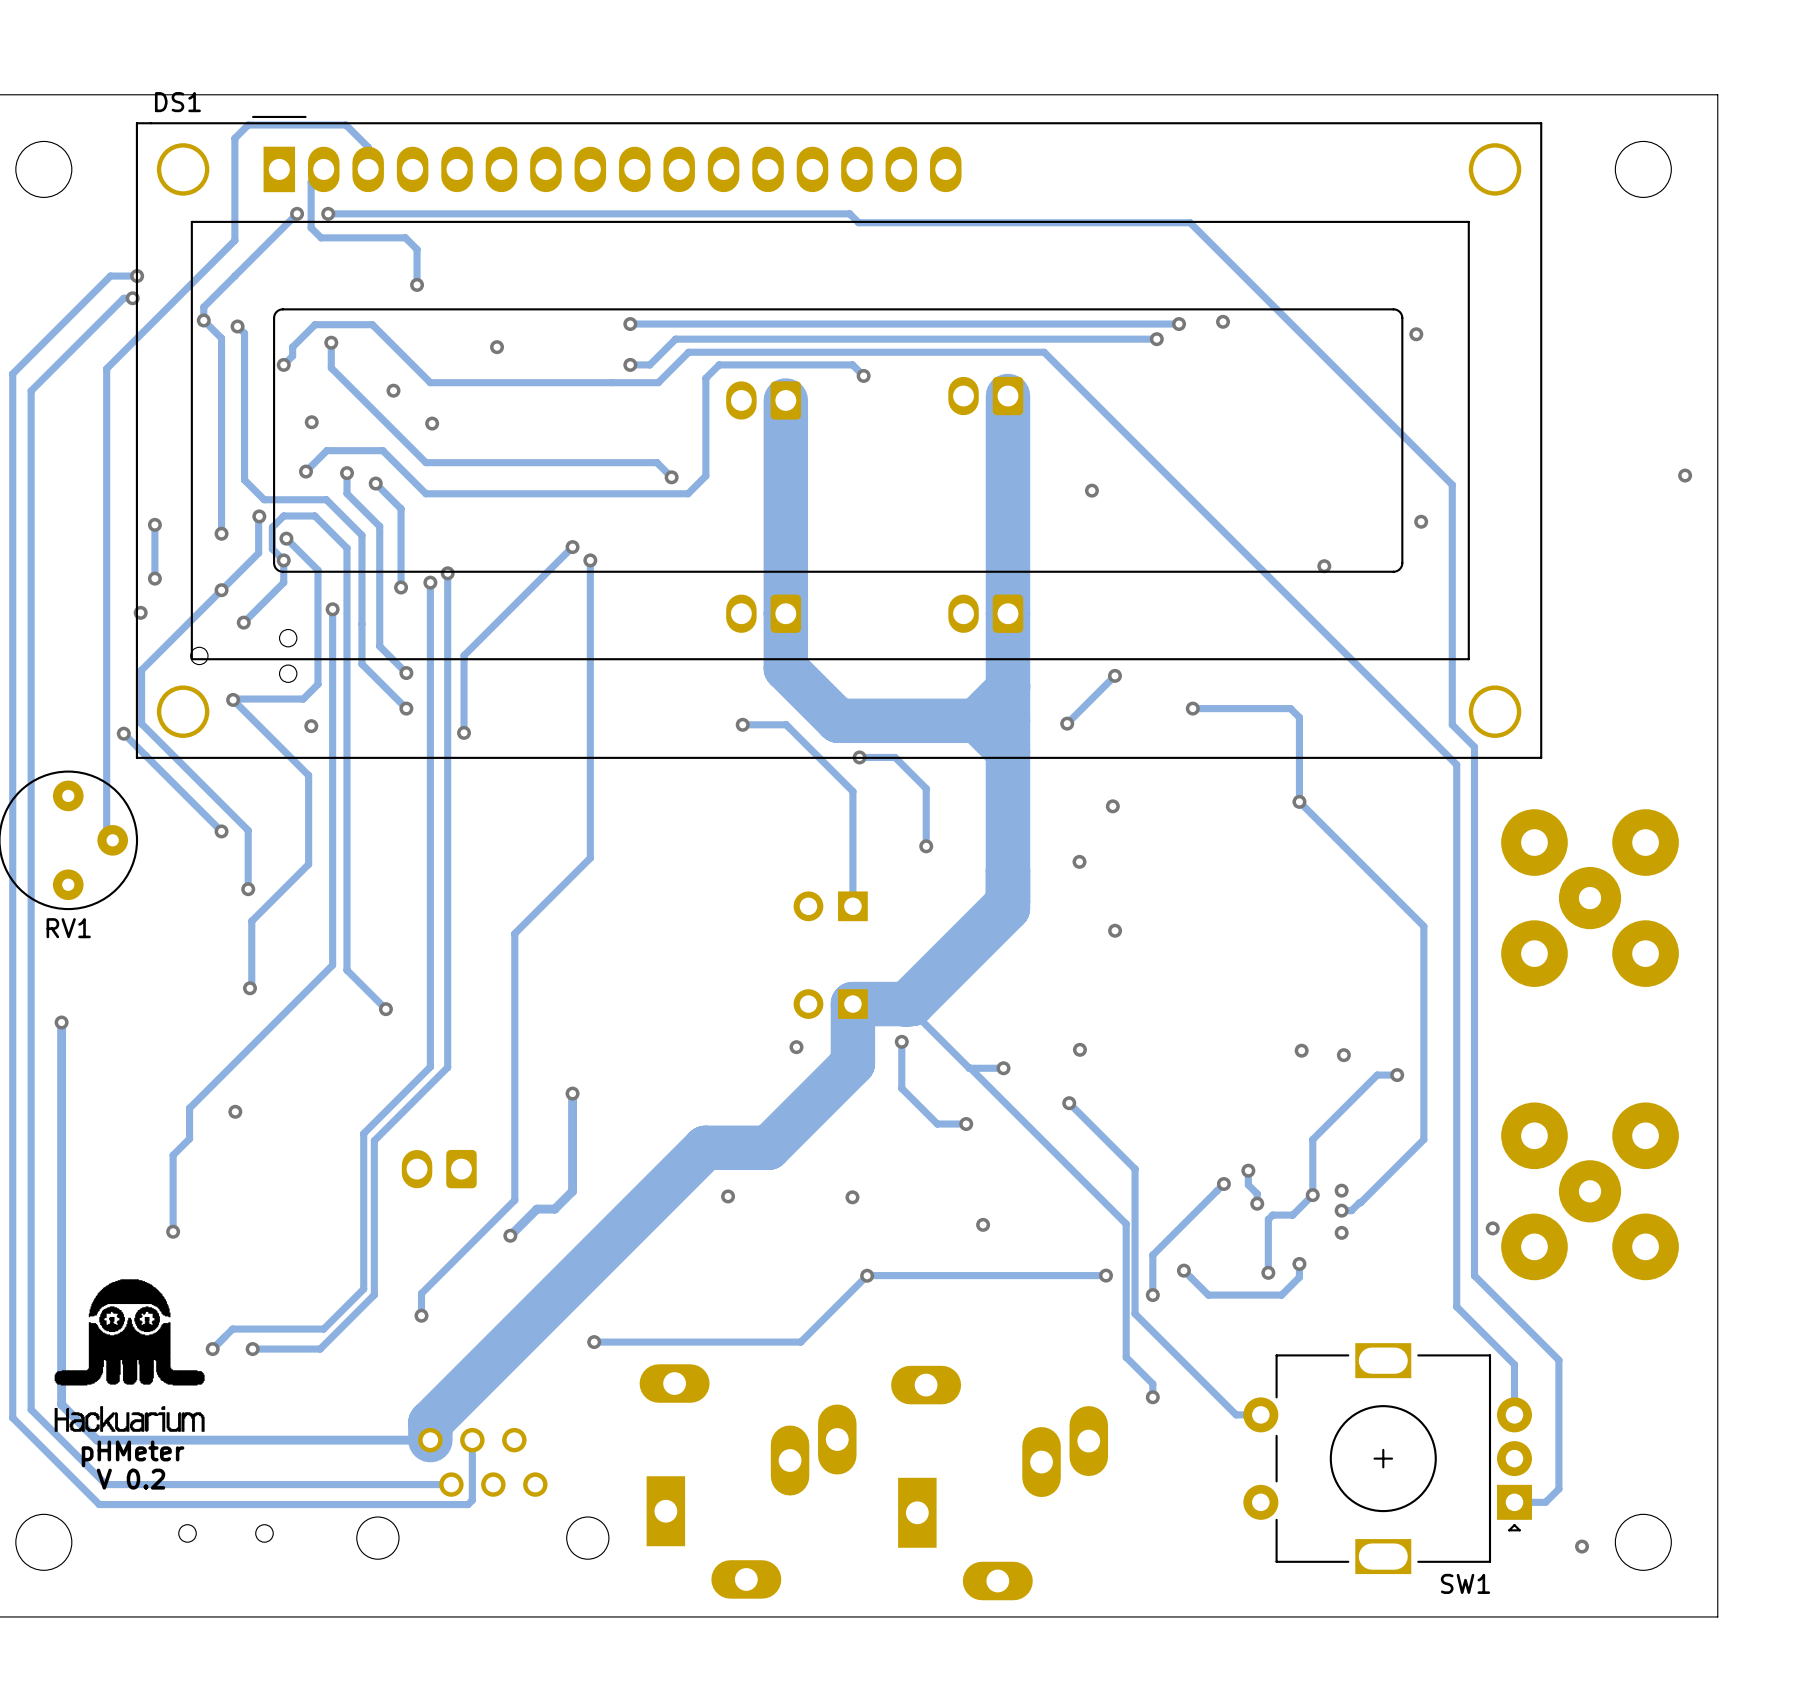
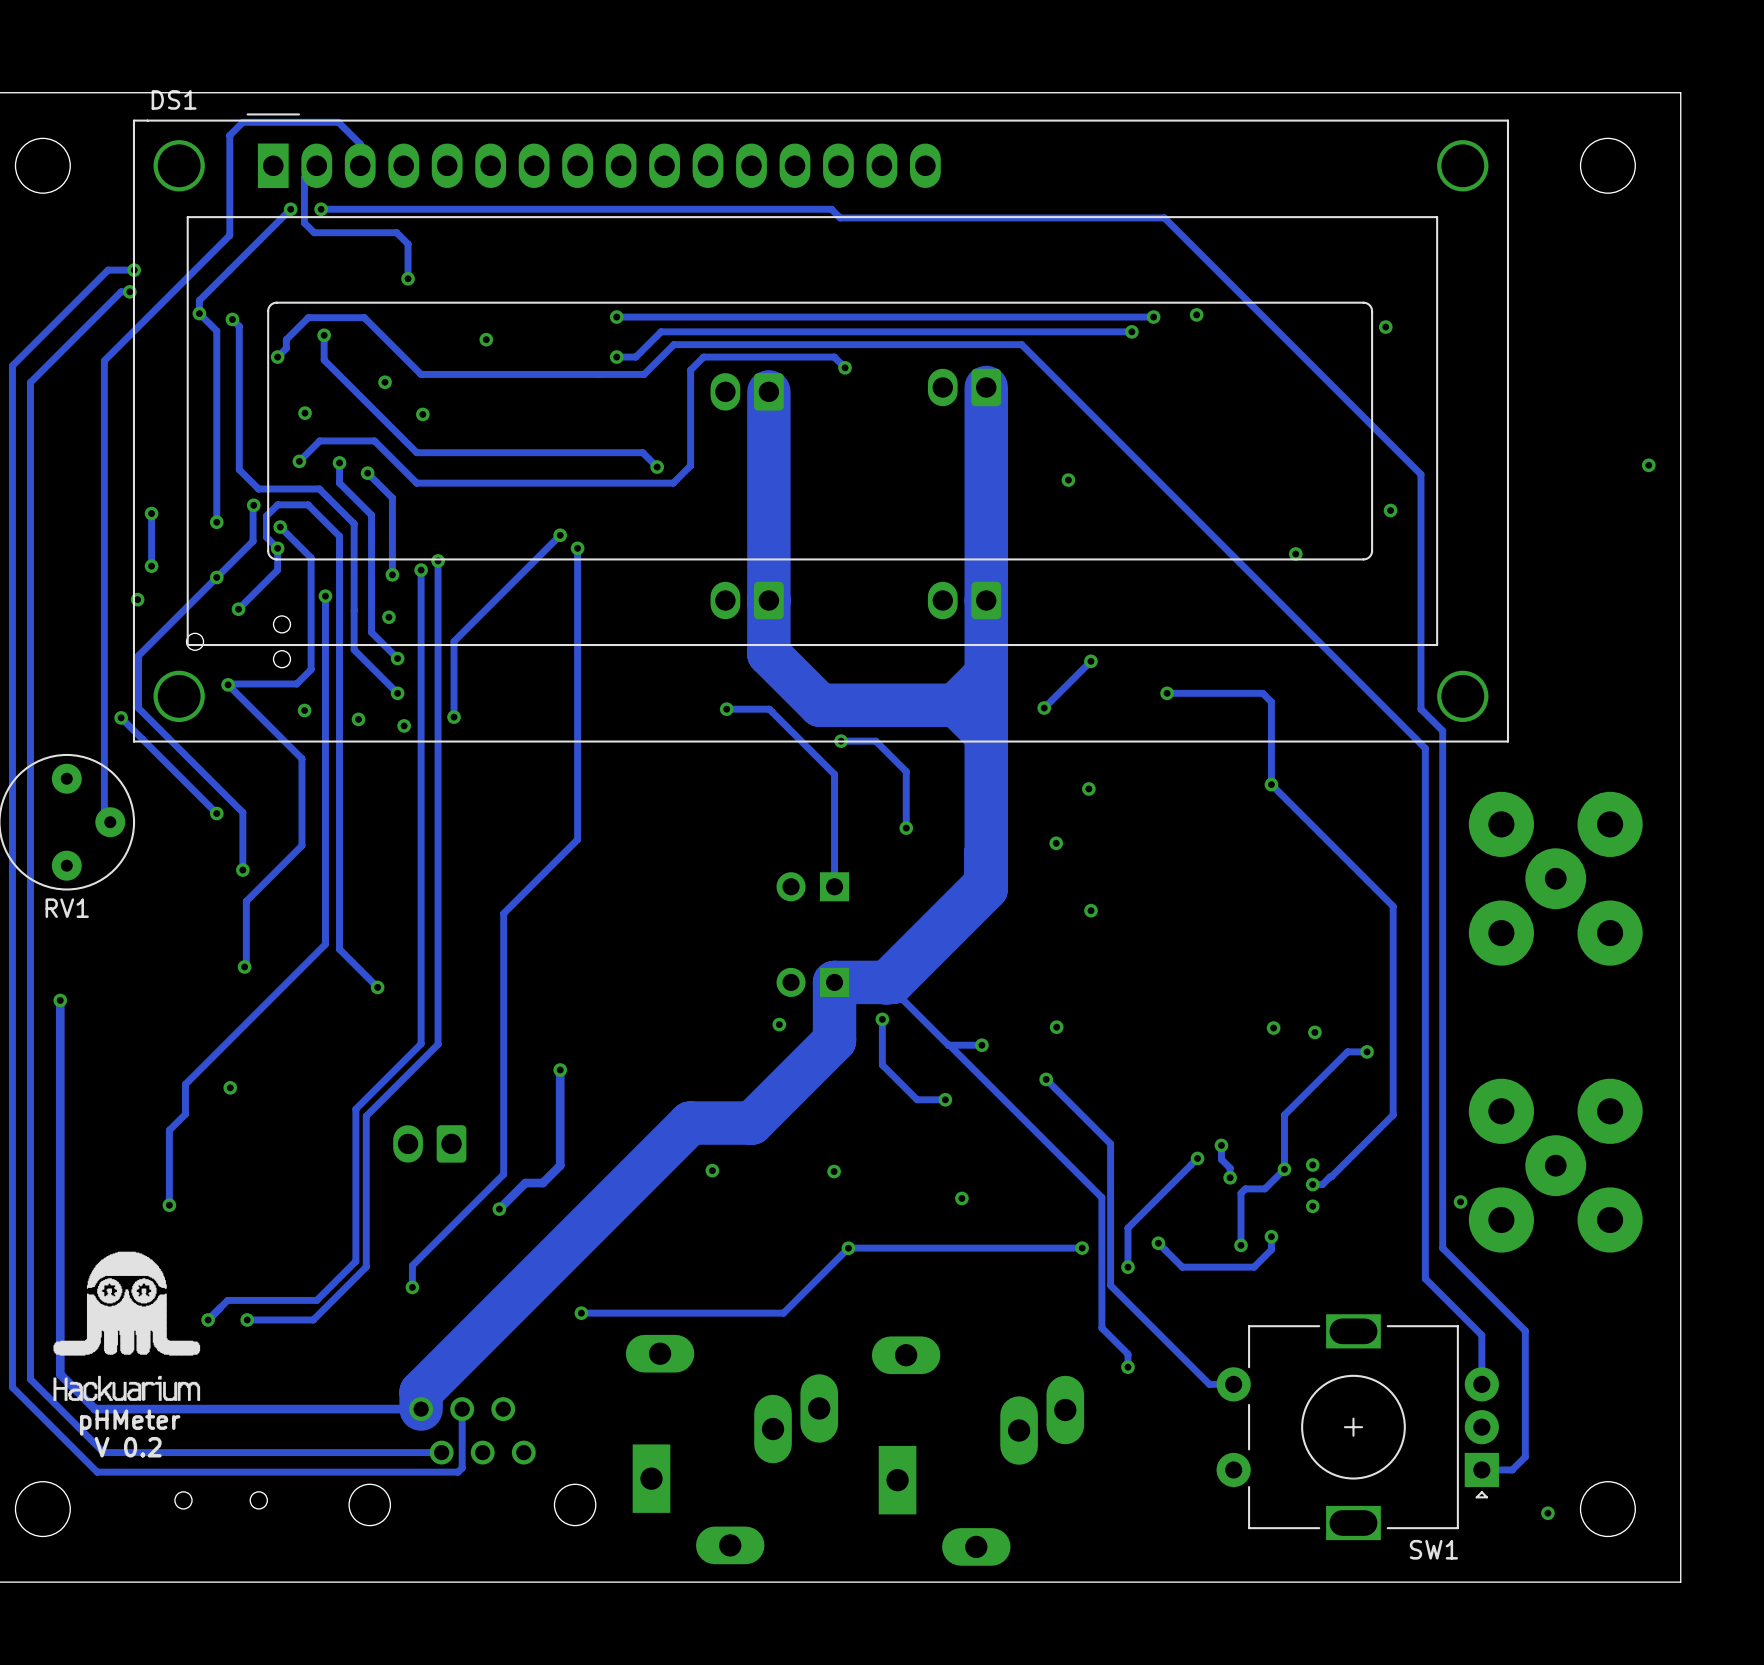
via: none -> (388, 617)
via: none -> (358, 719)
via: none -> (404, 725)

